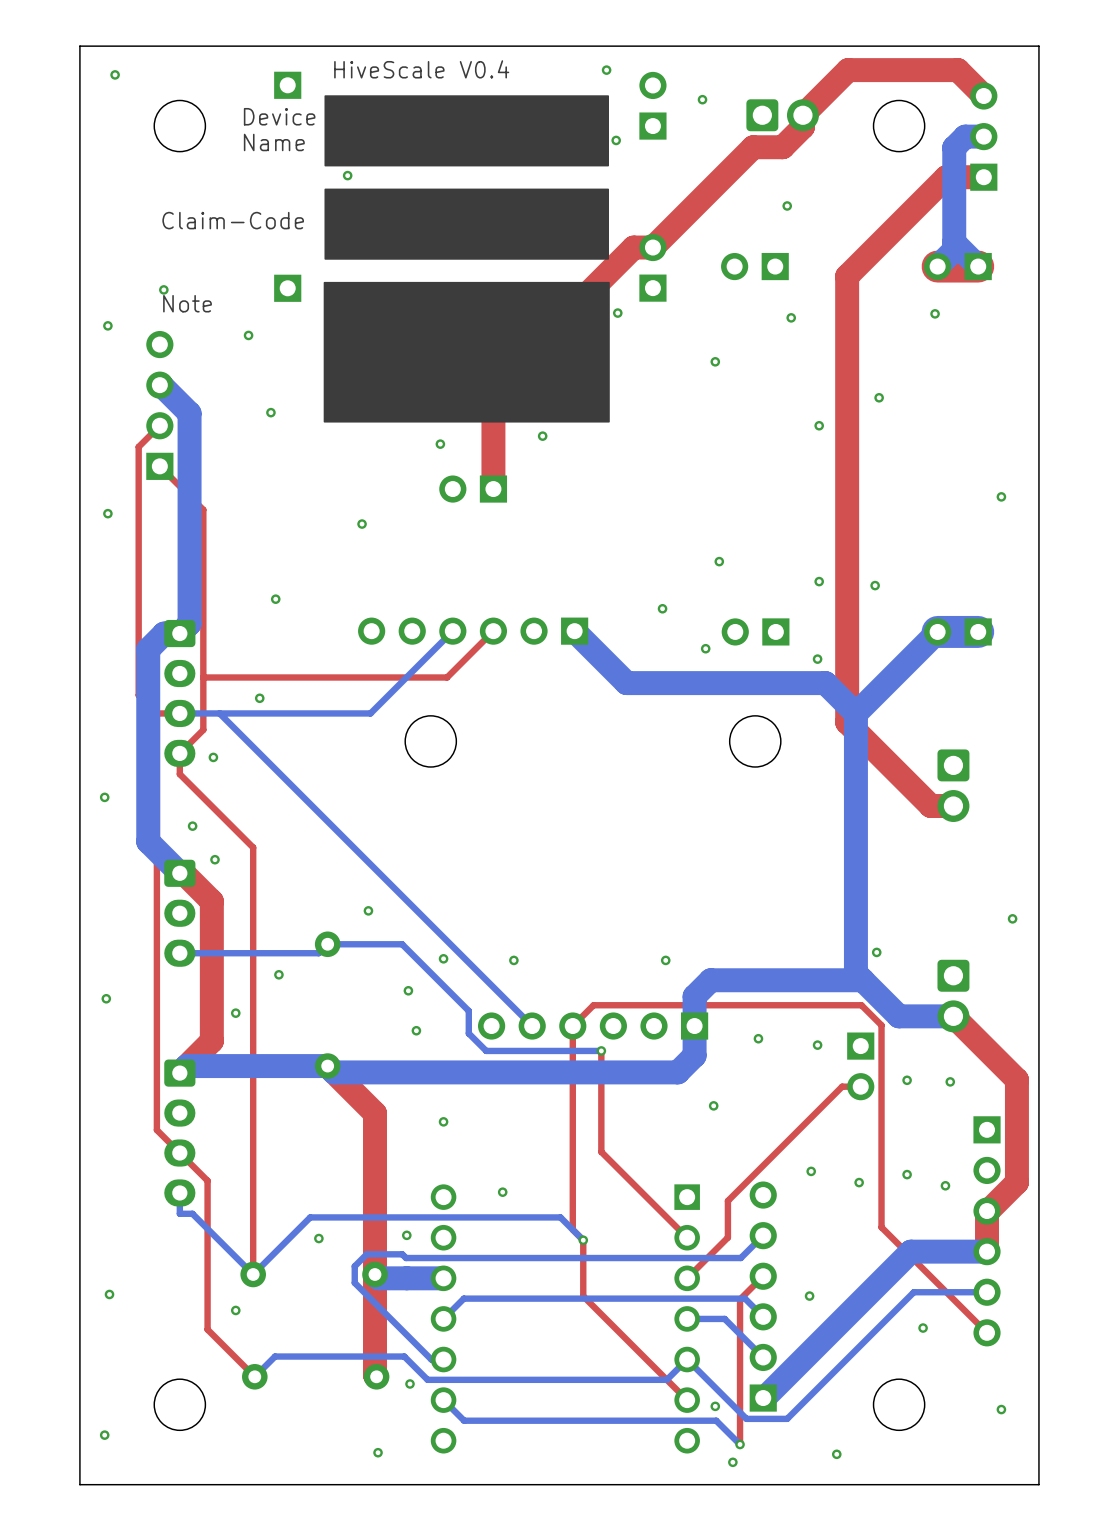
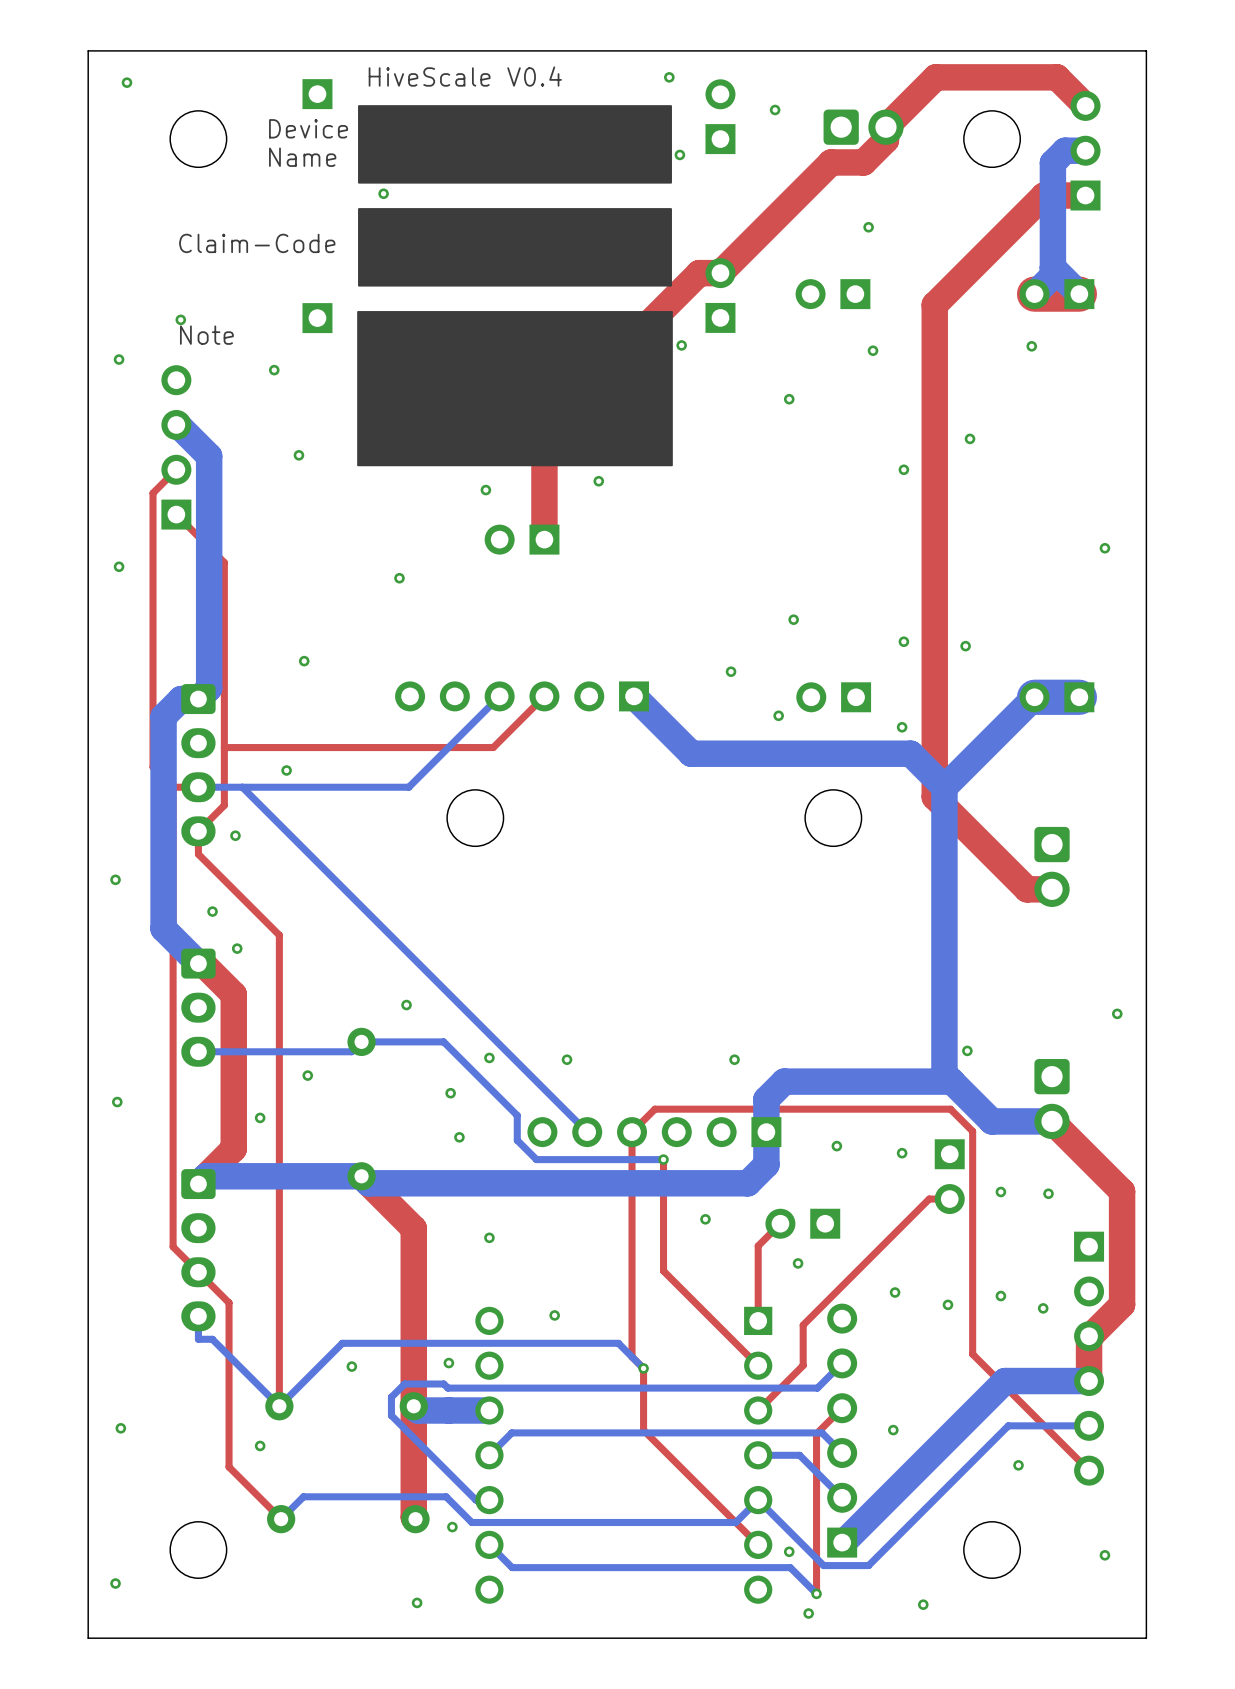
via: none -> (705, 1219)
via: (713, 1105) -> none
top track: none -> (780, 1223) (758, 1245) (758, 1320)
part: none -> (802, 1223)
via: none -> (798, 1263)

